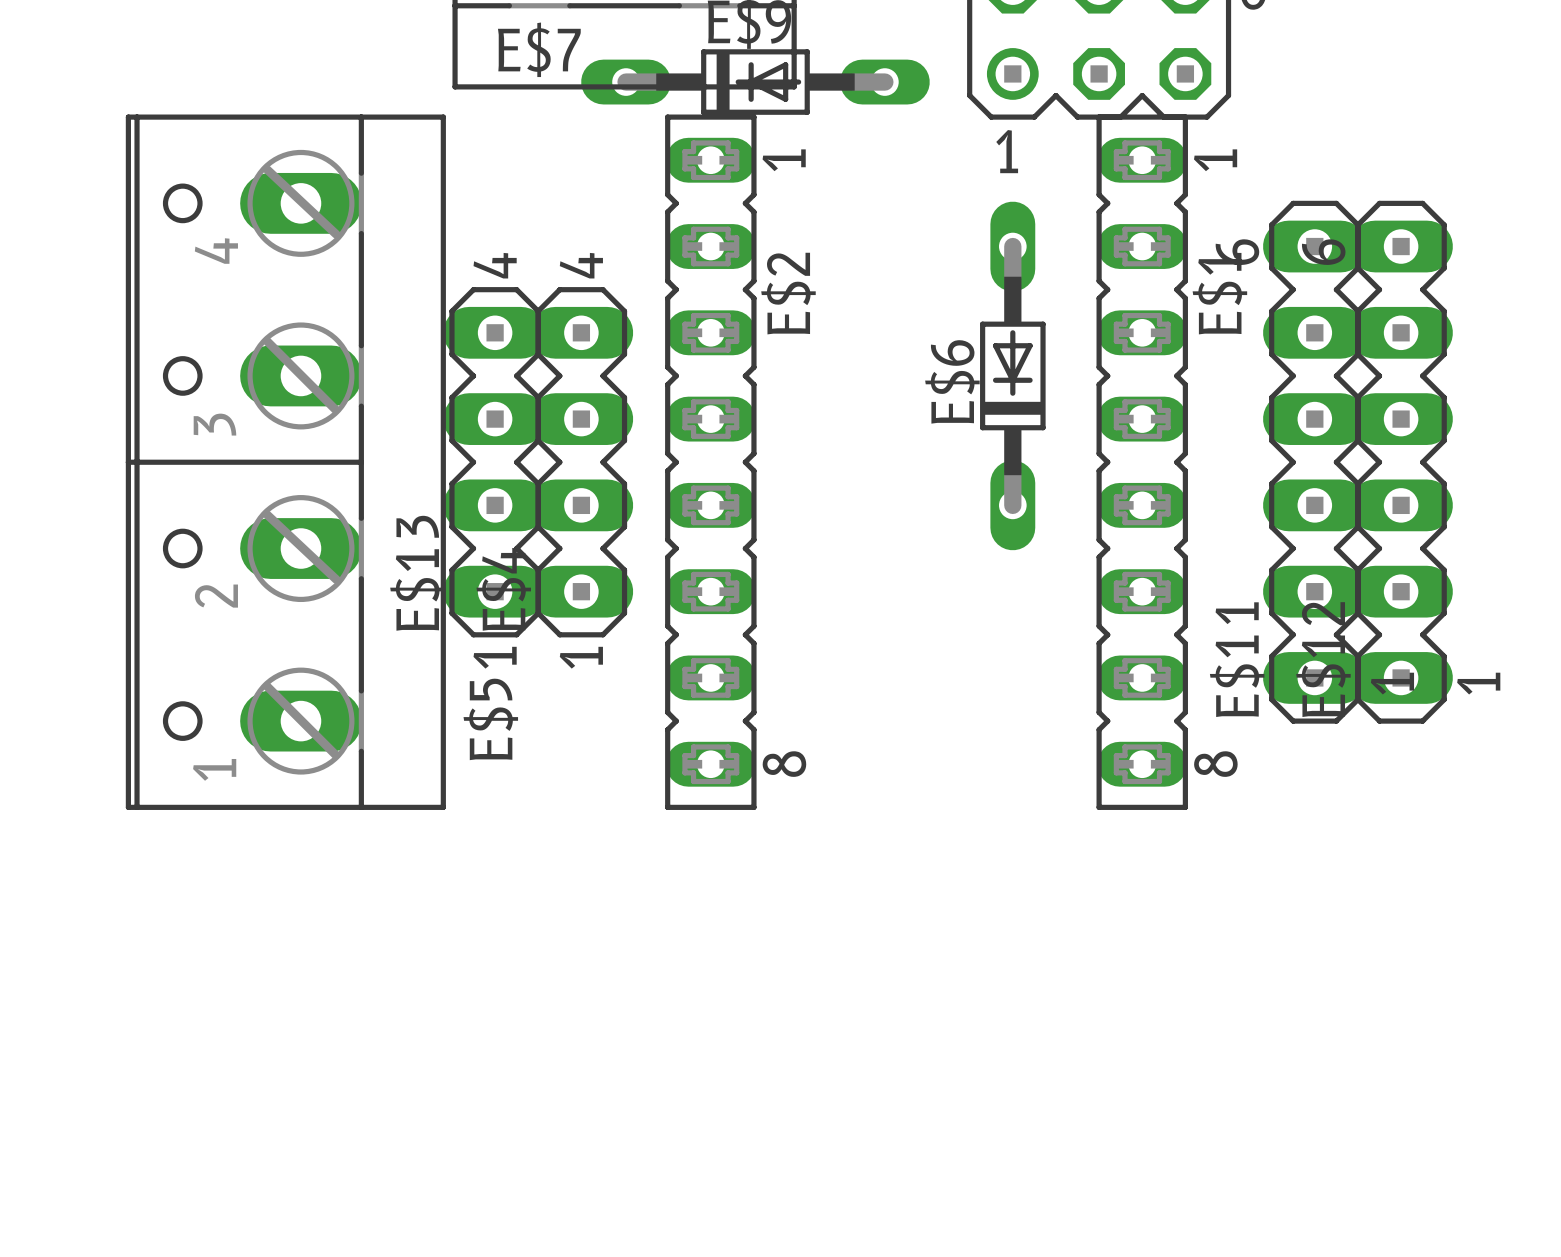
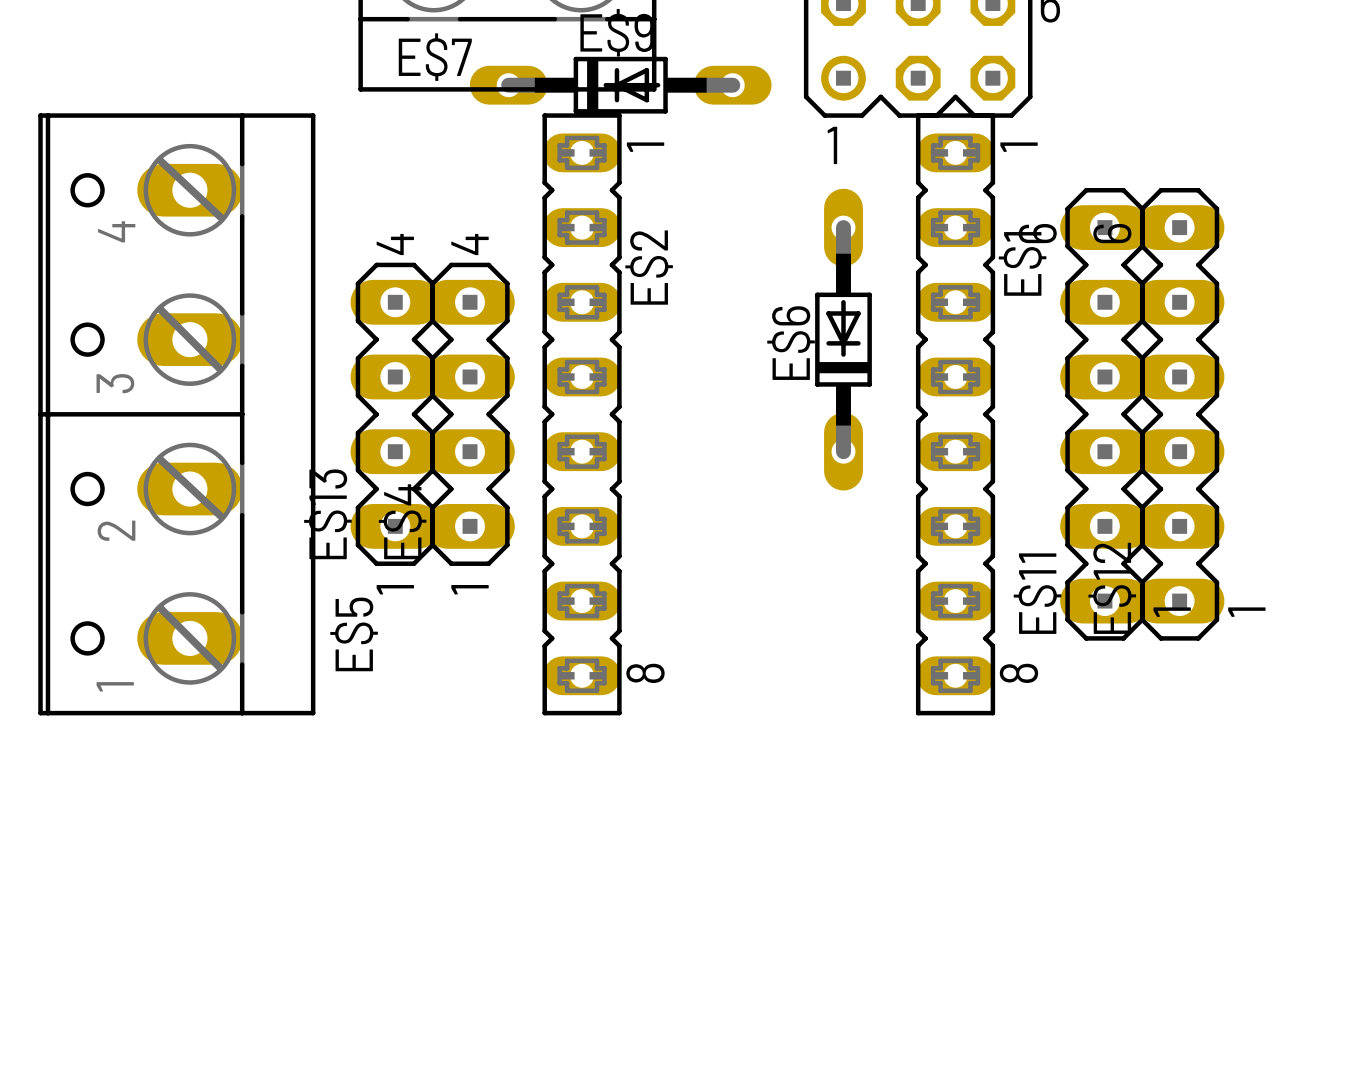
E$5 position: (285, 462) -> (176, 414)

